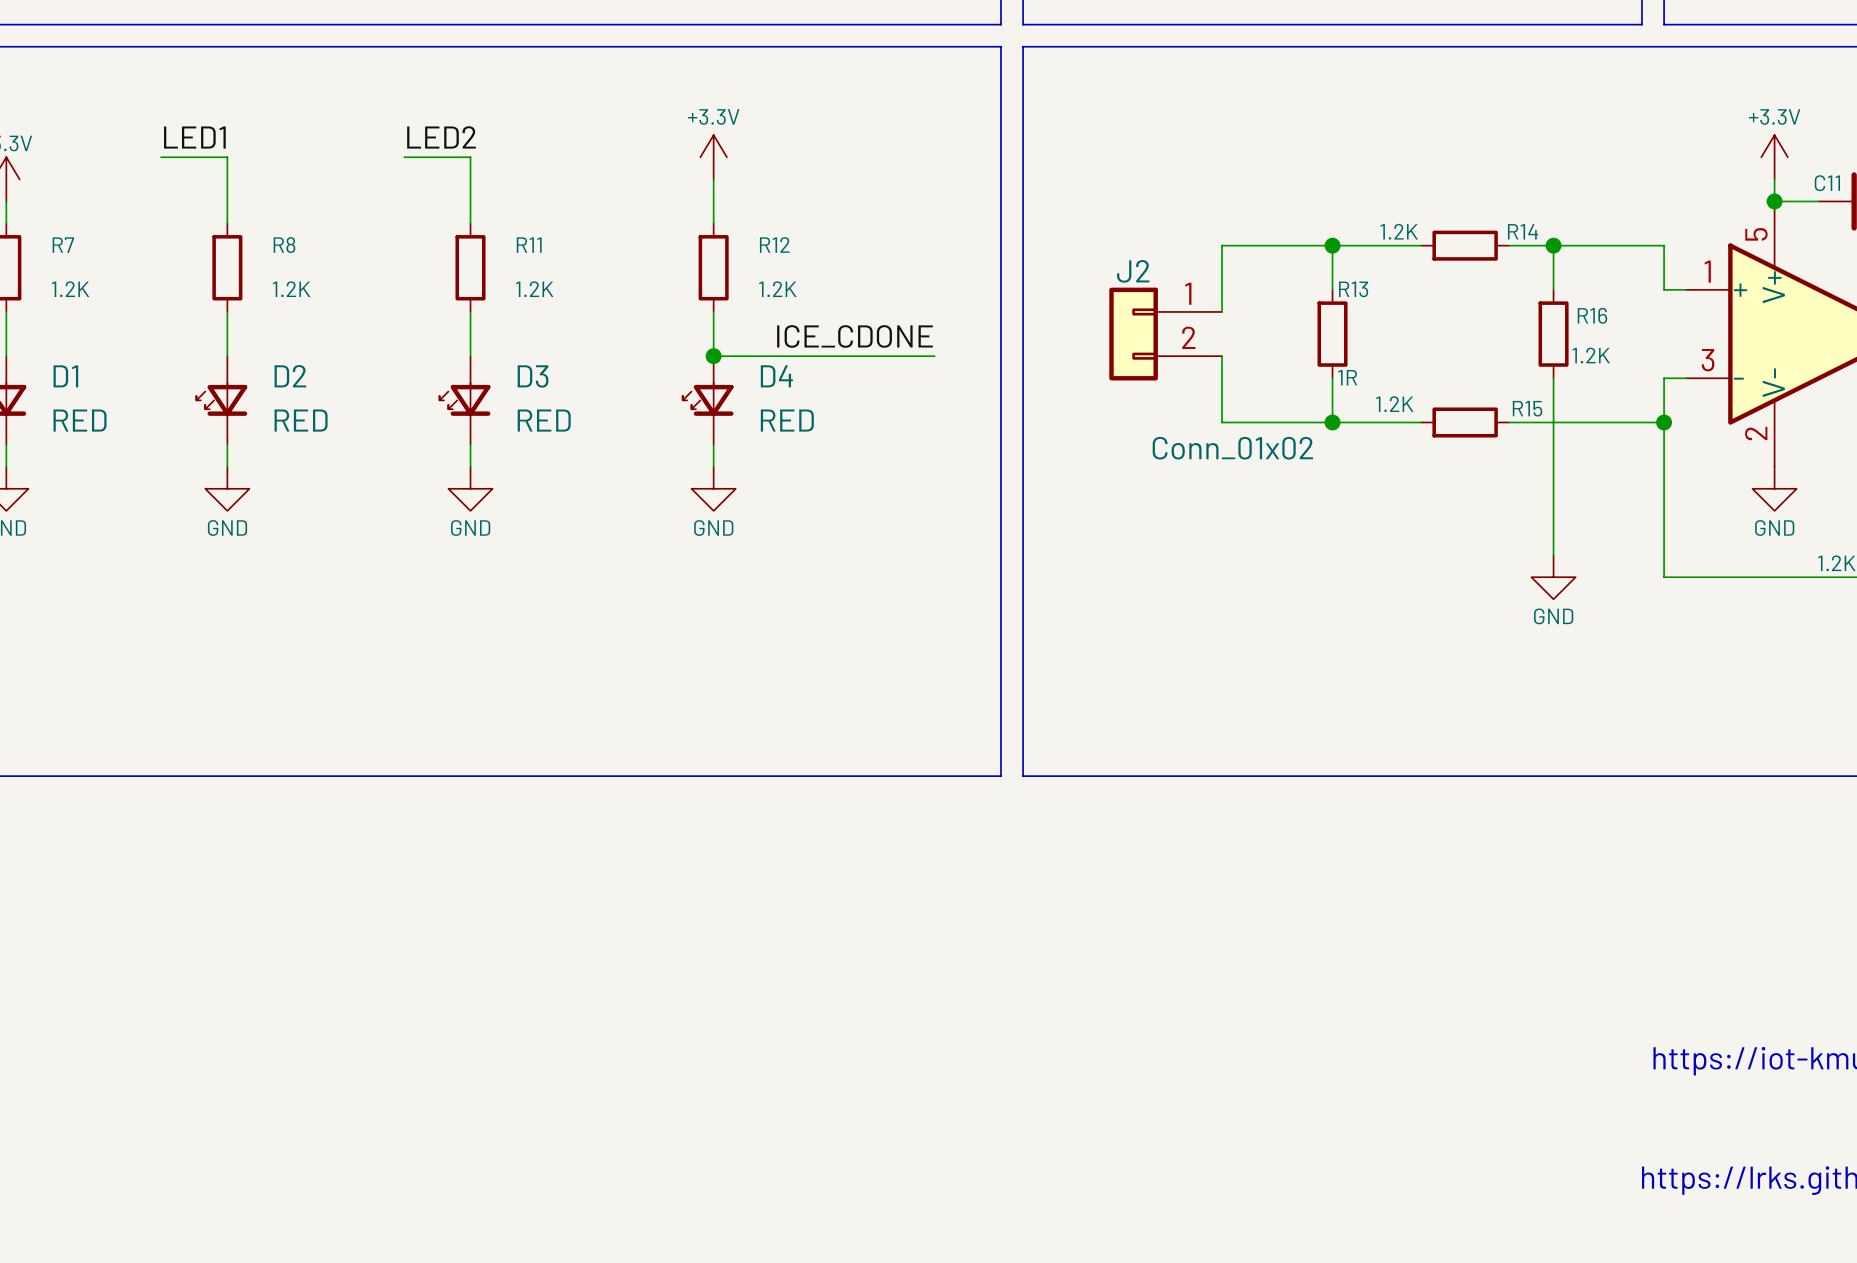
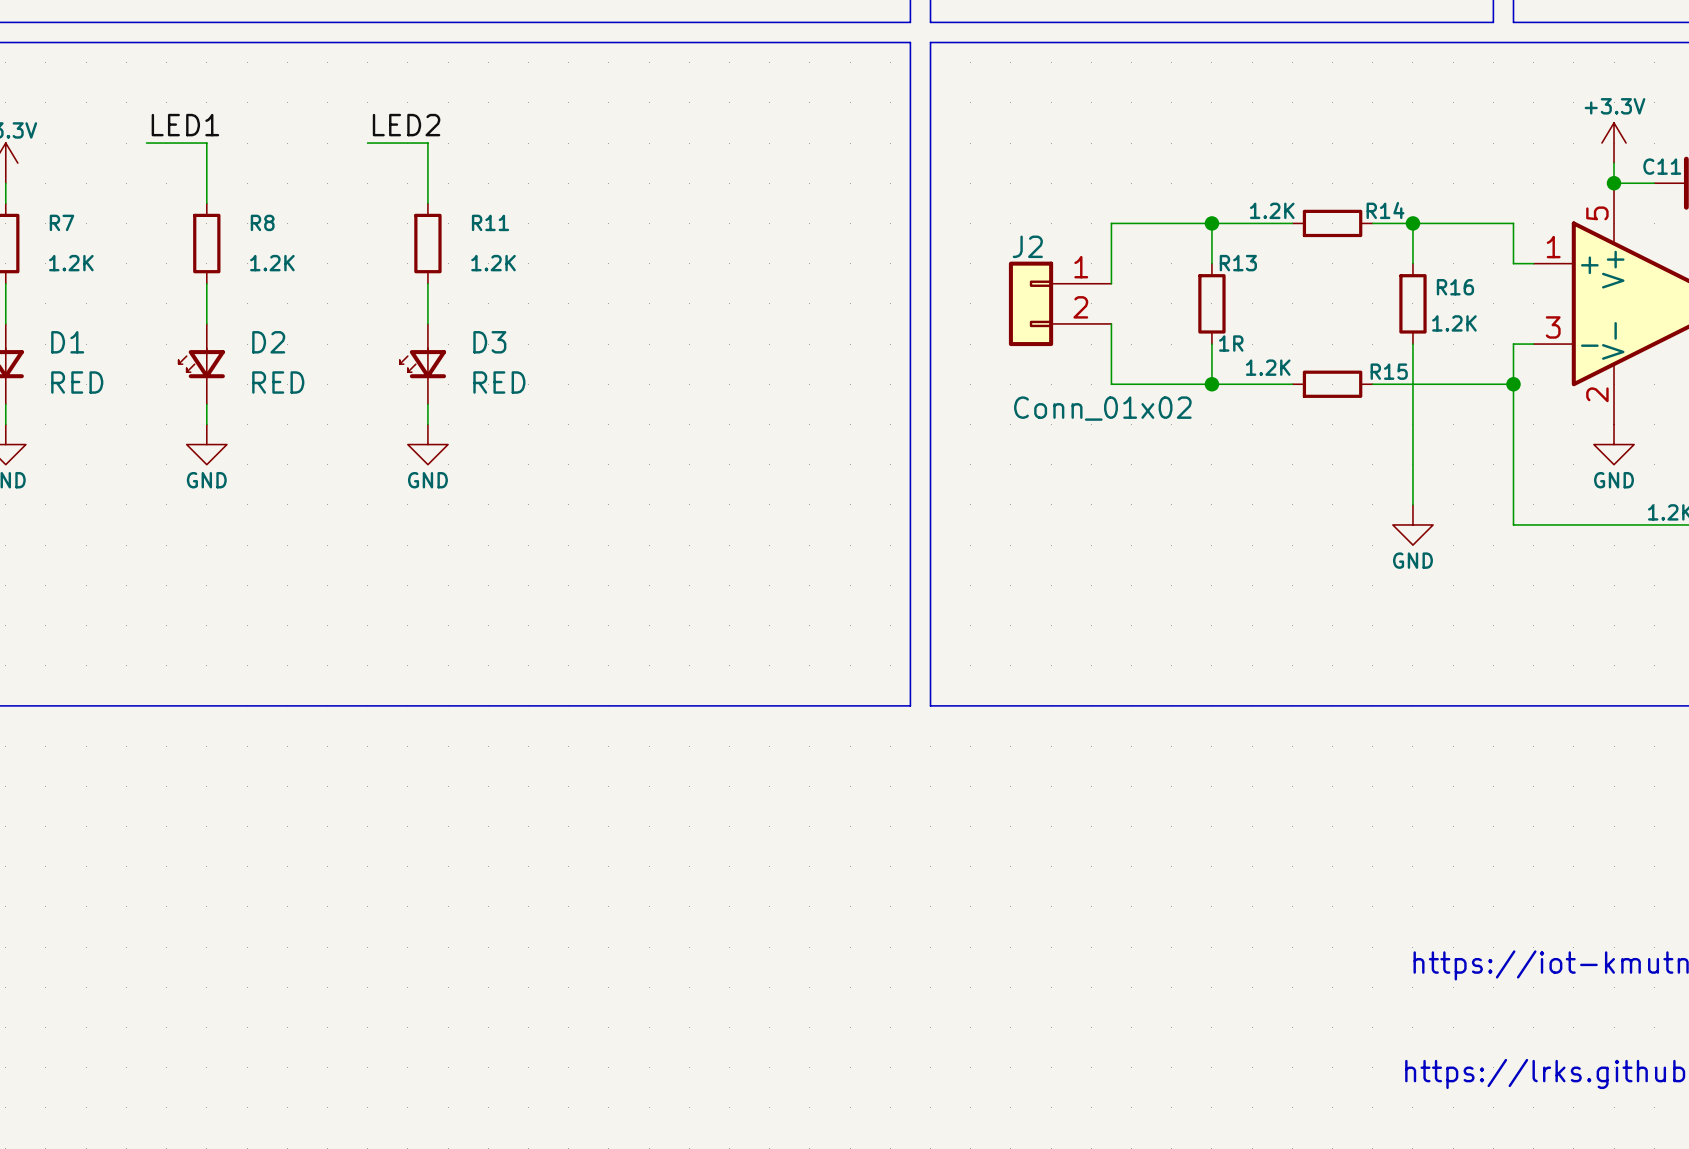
power symbol: +3.3V (713, 157) -> none
wire: (713, 179) (713, 223) -> none
R12: 1.2K (713, 267) -> none
wire: (713, 311) (713, 356) (934, 356) -> none
label: ICE_CDONE (854, 336) -> none
junction: (713, 356) -> none
D4: RED (708, 400) -> none
wire: (713, 444) (713, 466) -> none
power symbol: GND (713, 488) -> none

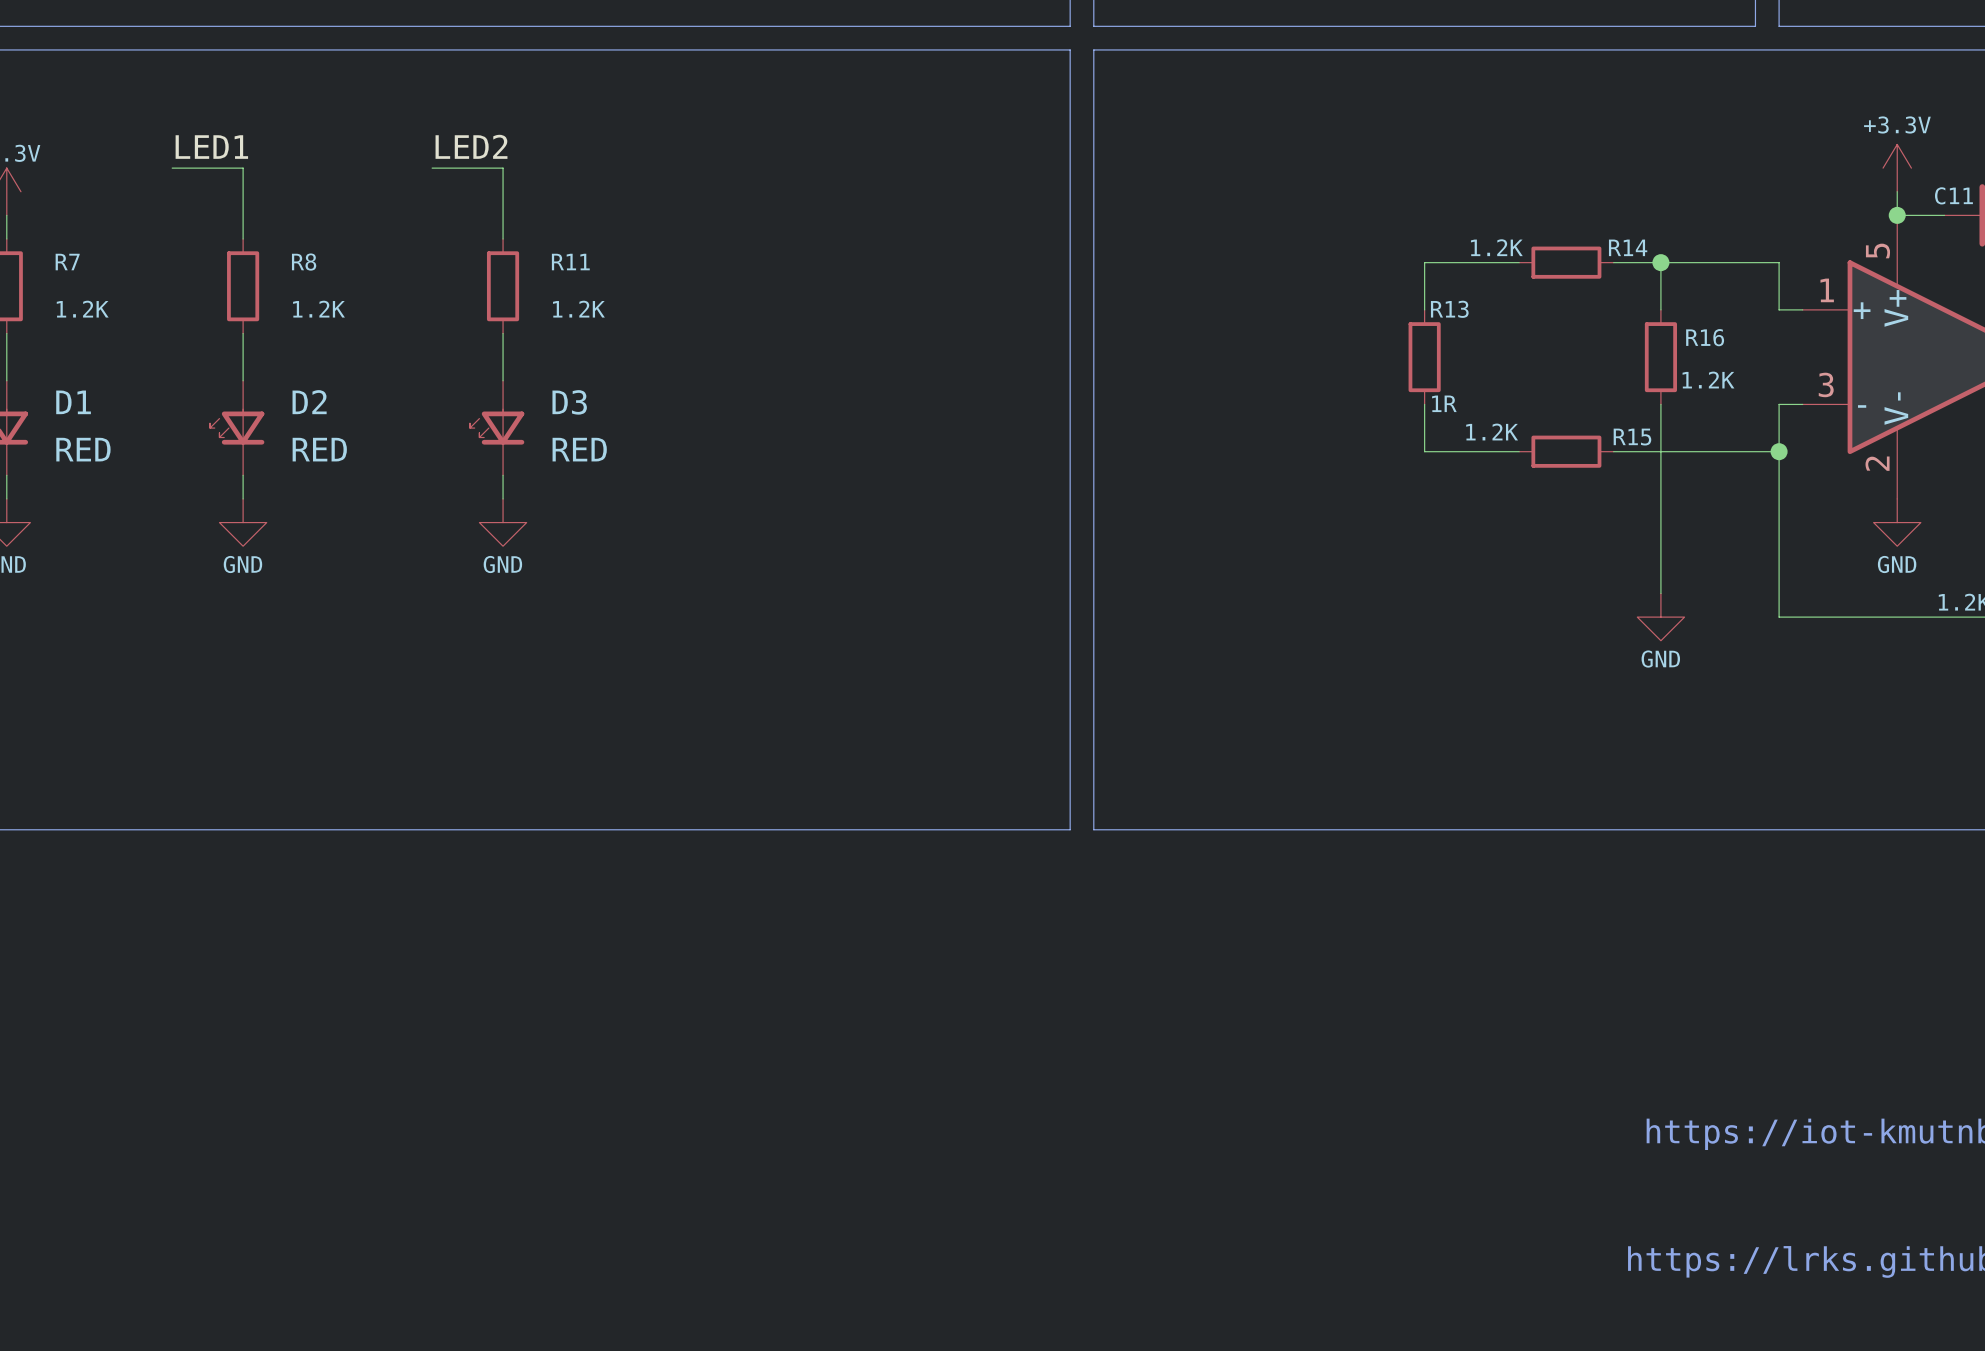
wire: (1211, 223) (1111, 223) (1111, 283) -> none
junction: (1211, 223) -> none
J2: Conn_01x02 (1060, 303) -> none
wire: (1111, 323) (1111, 384) (1211, 384) -> none
junction: (1211, 384) -> none

